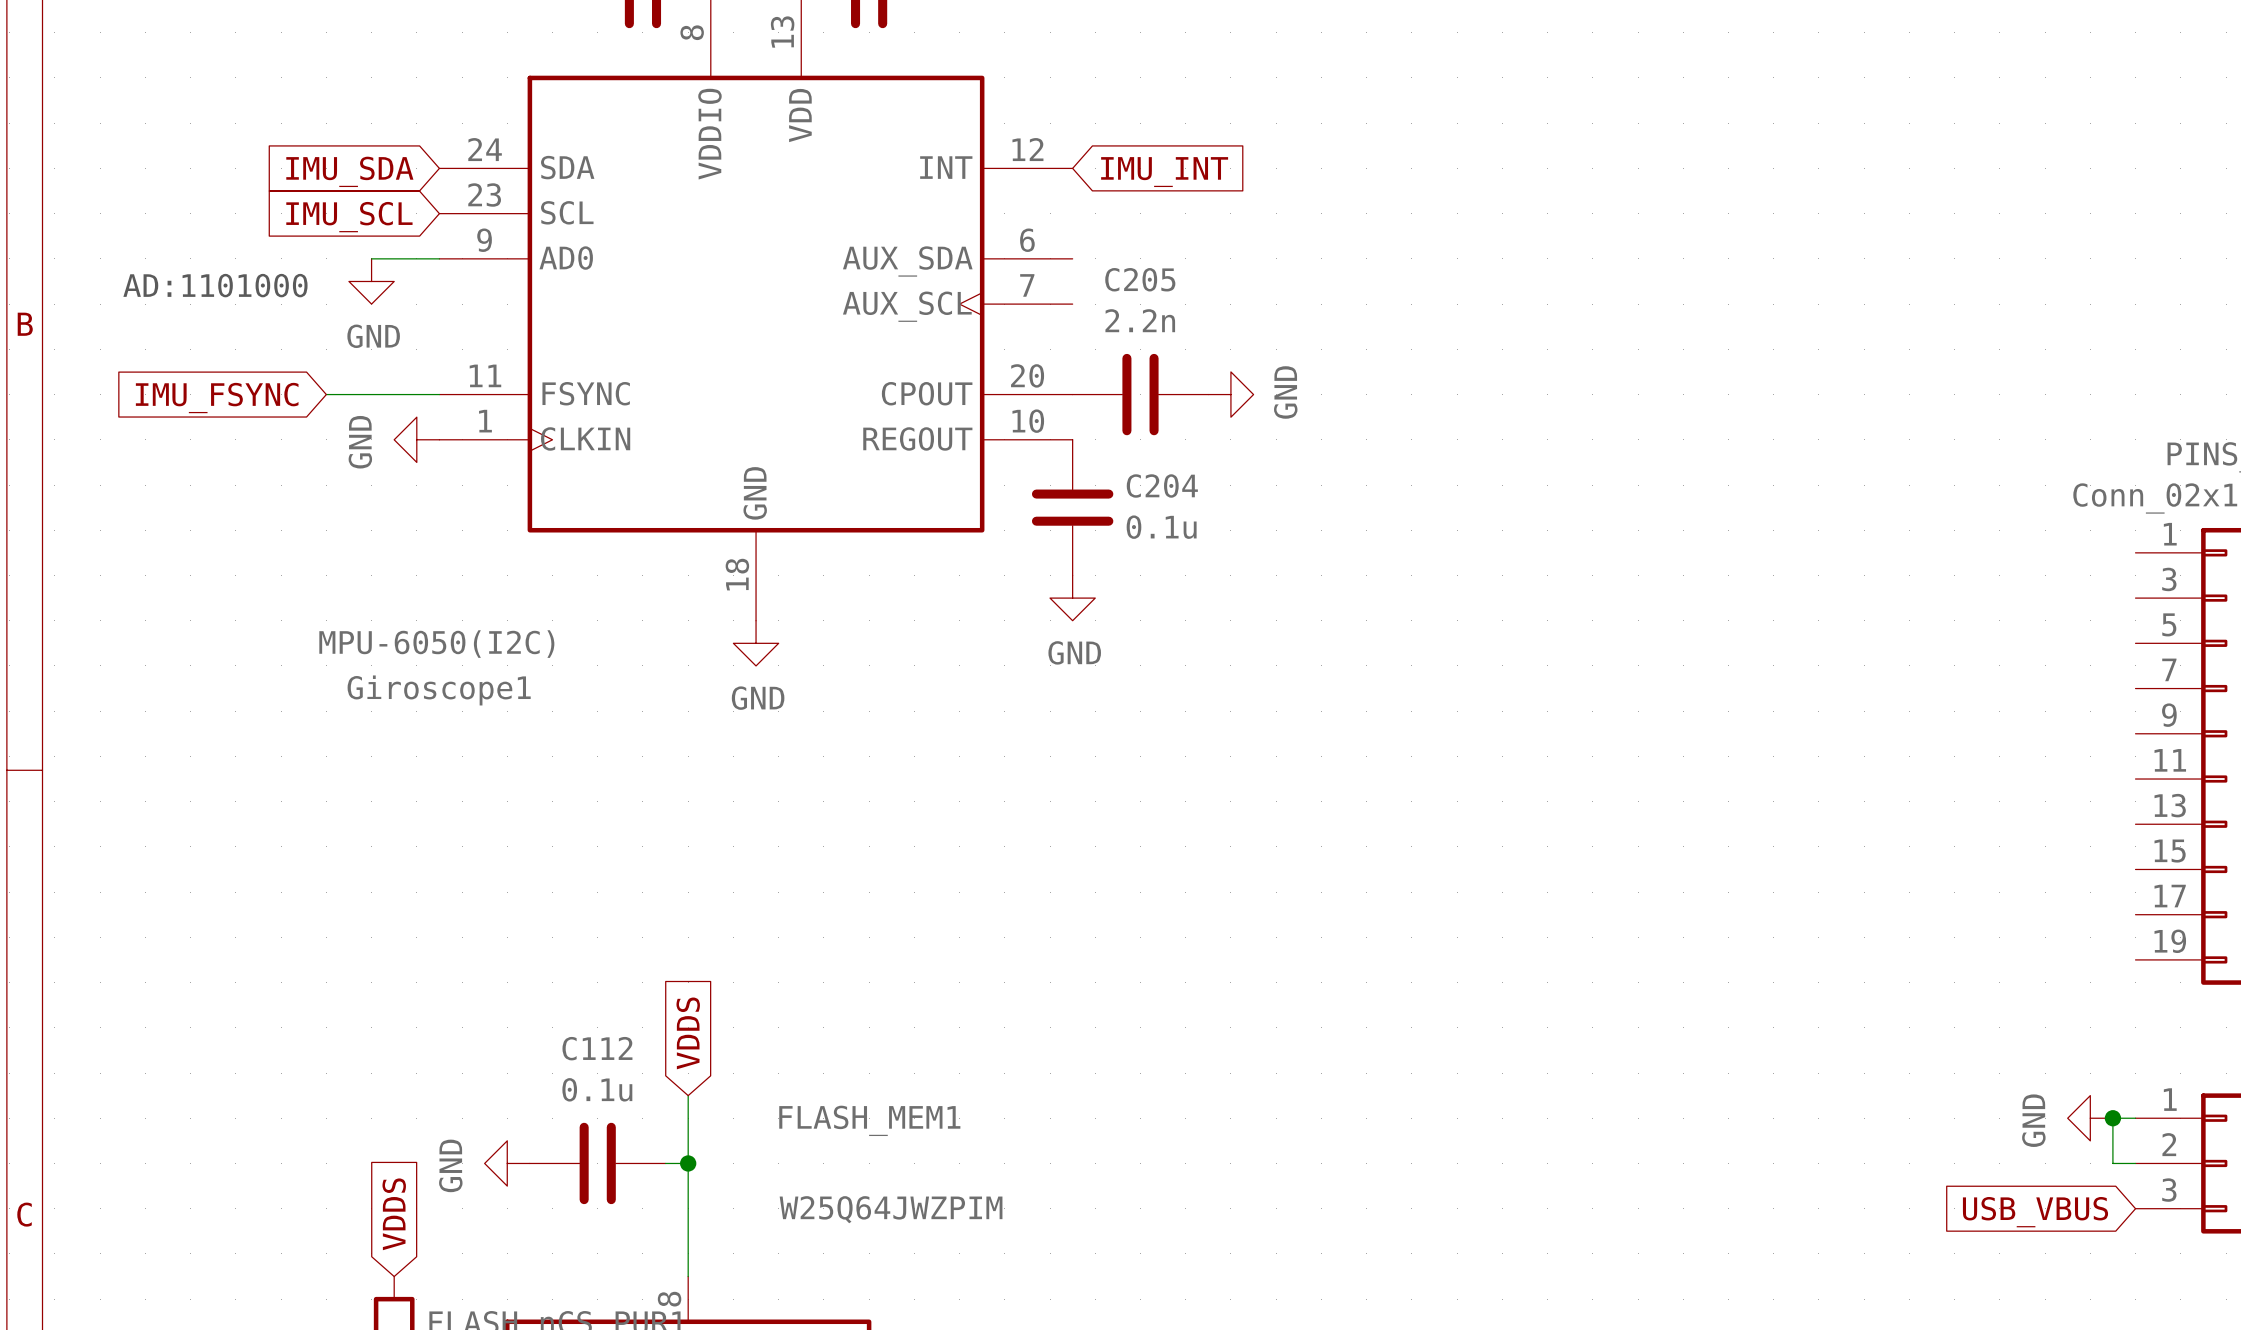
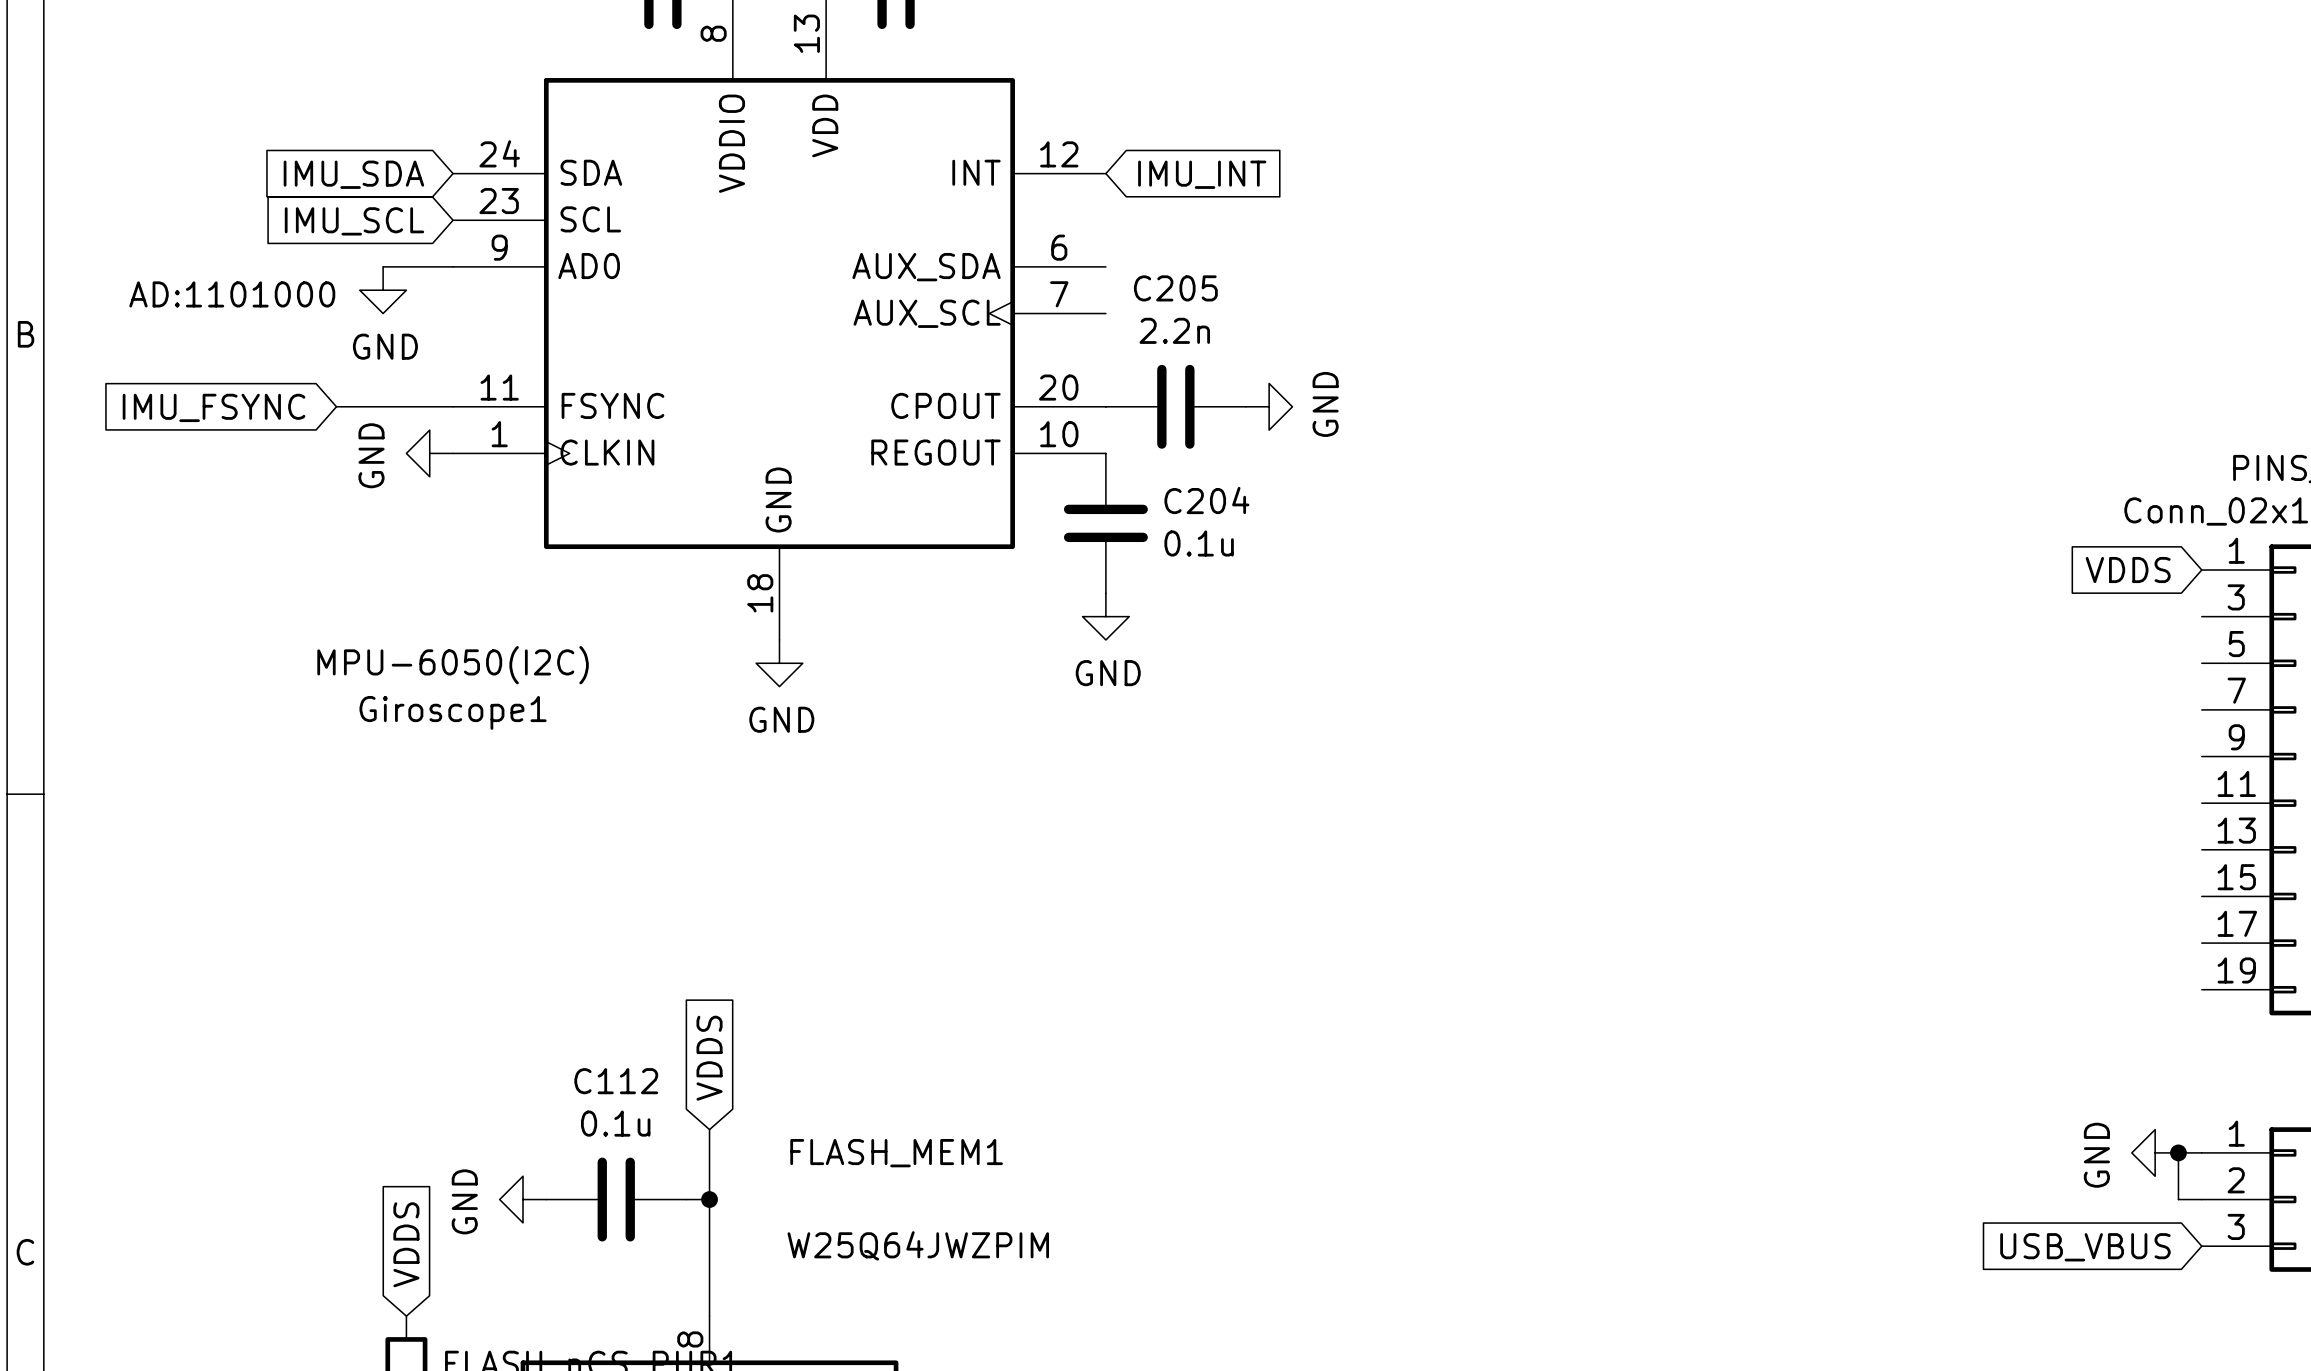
global label: none -> VDDS (2128, 570)

